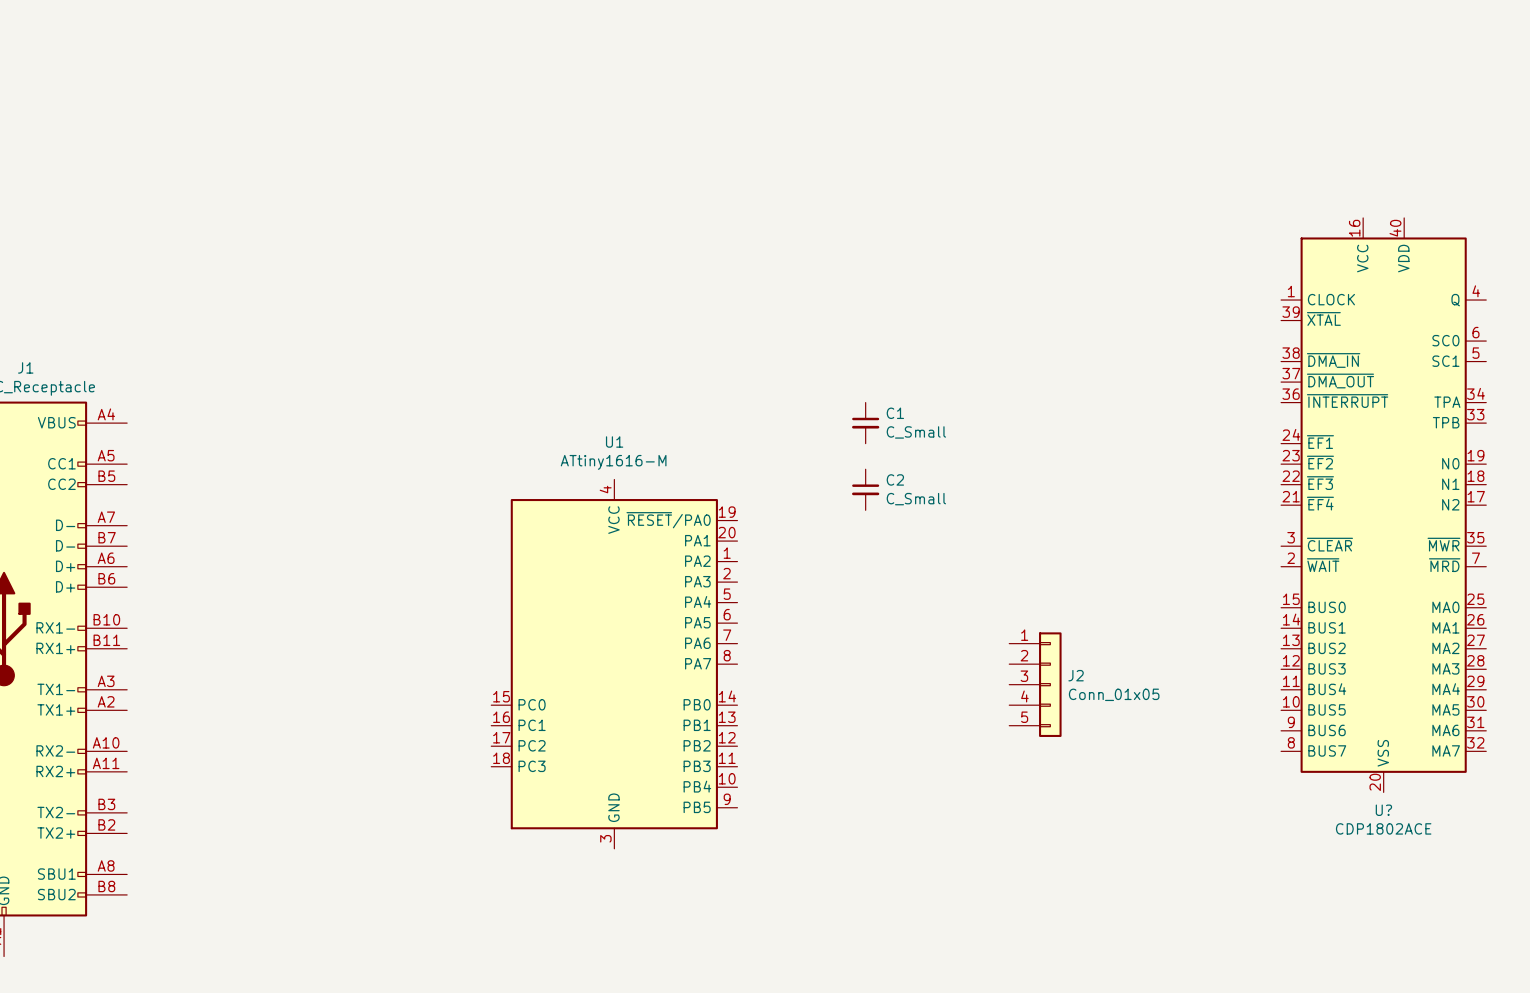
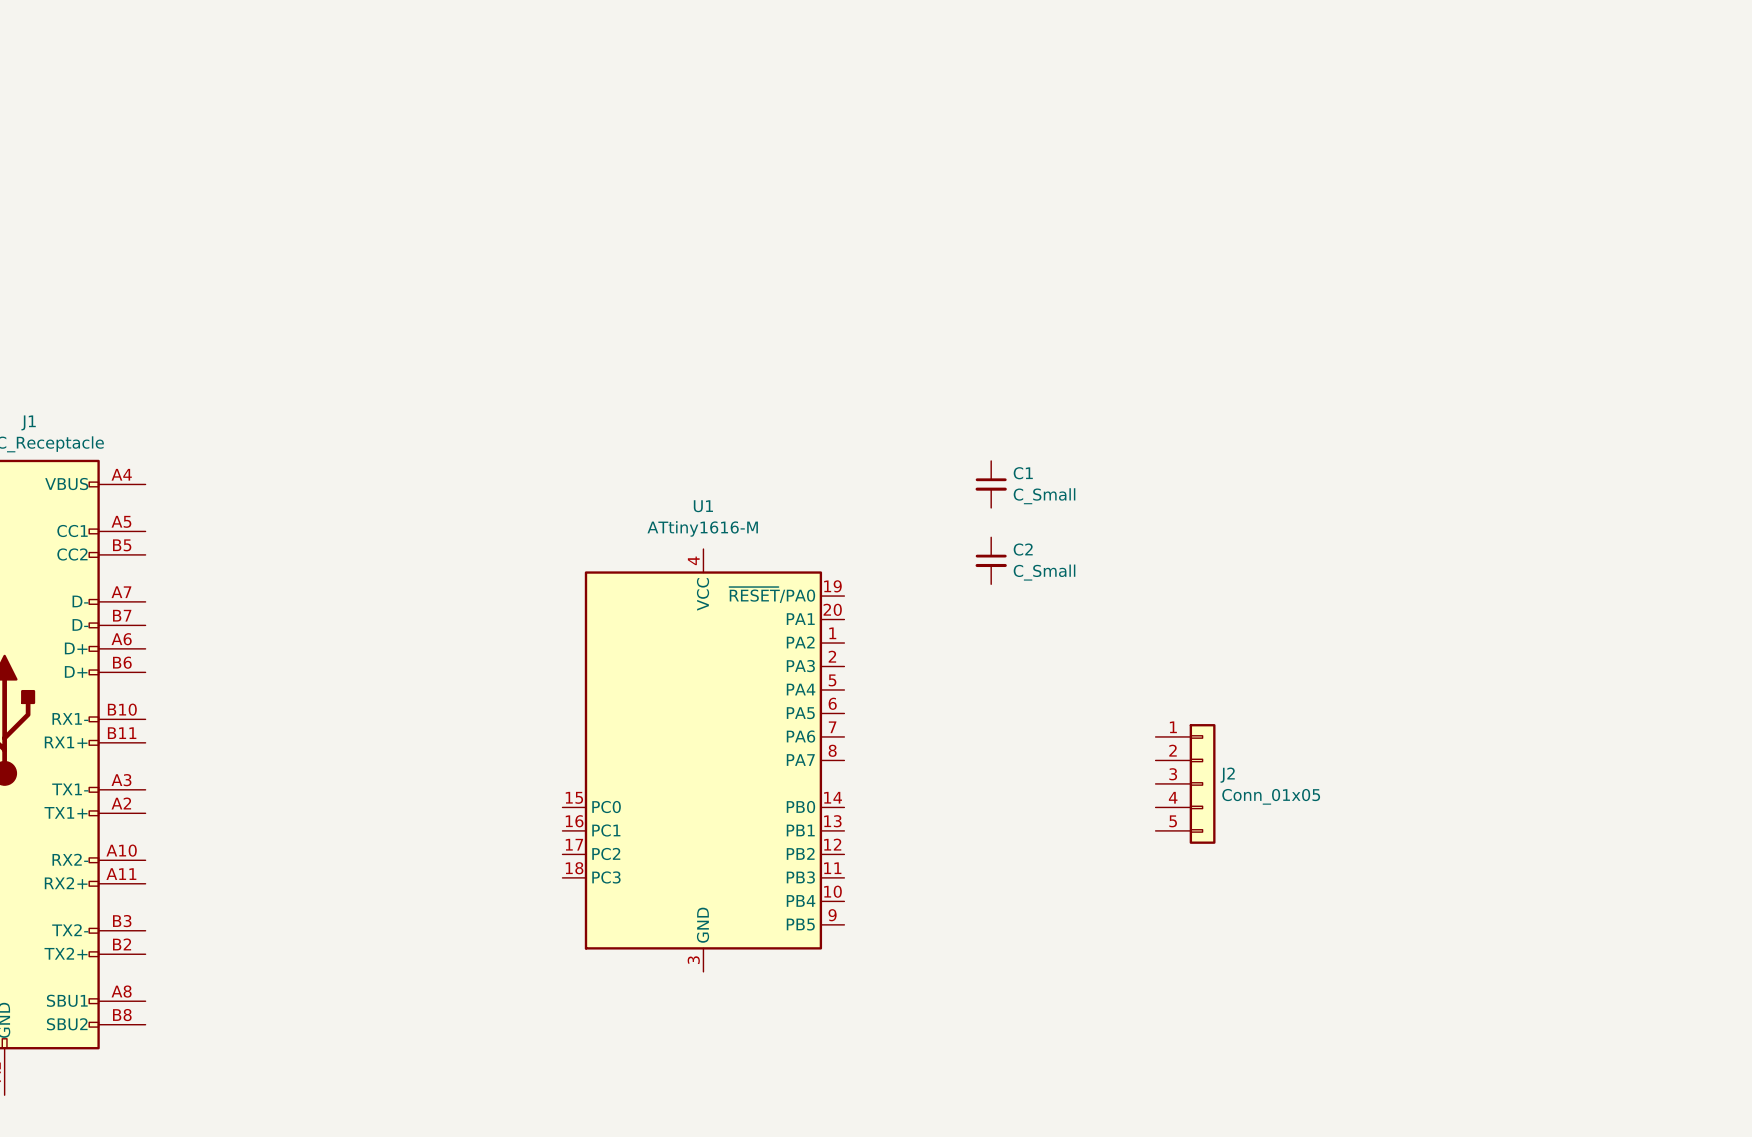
U?: CDP1802ACE (1383, 505) -> none

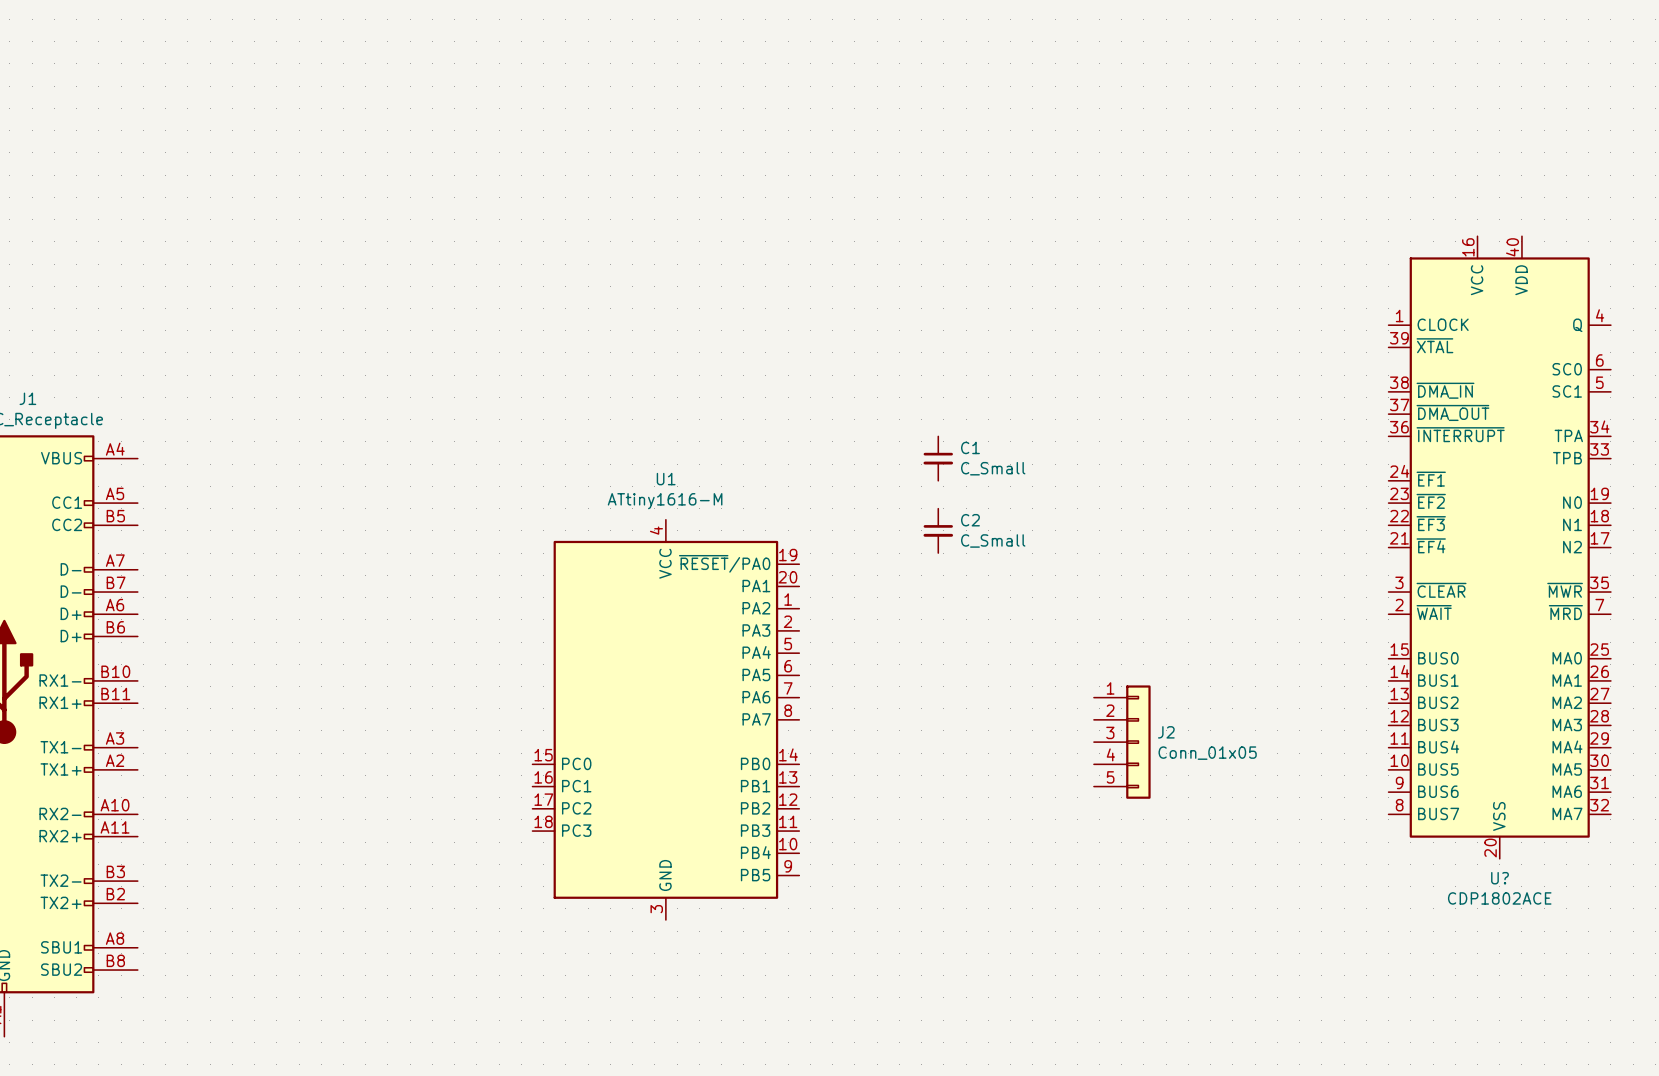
U?: none -> CDP1802ACE (1499, 547)

